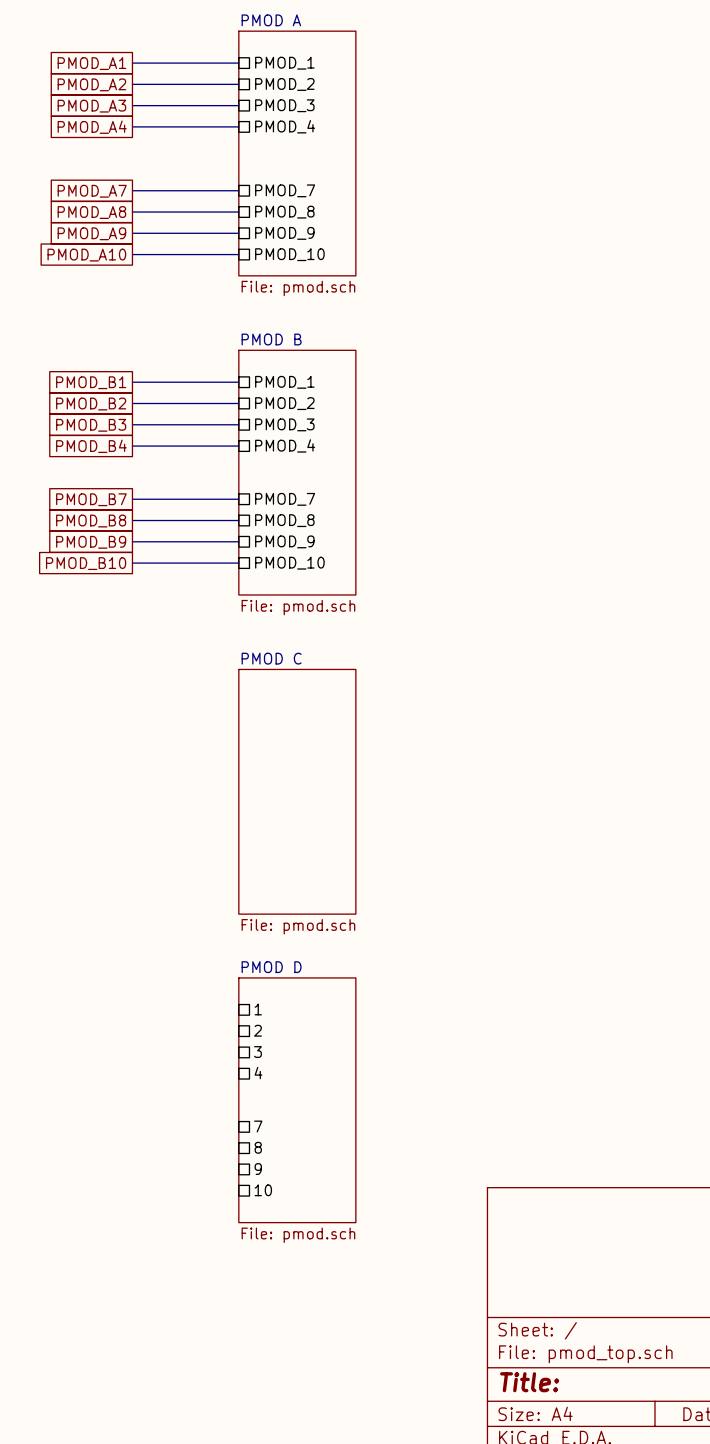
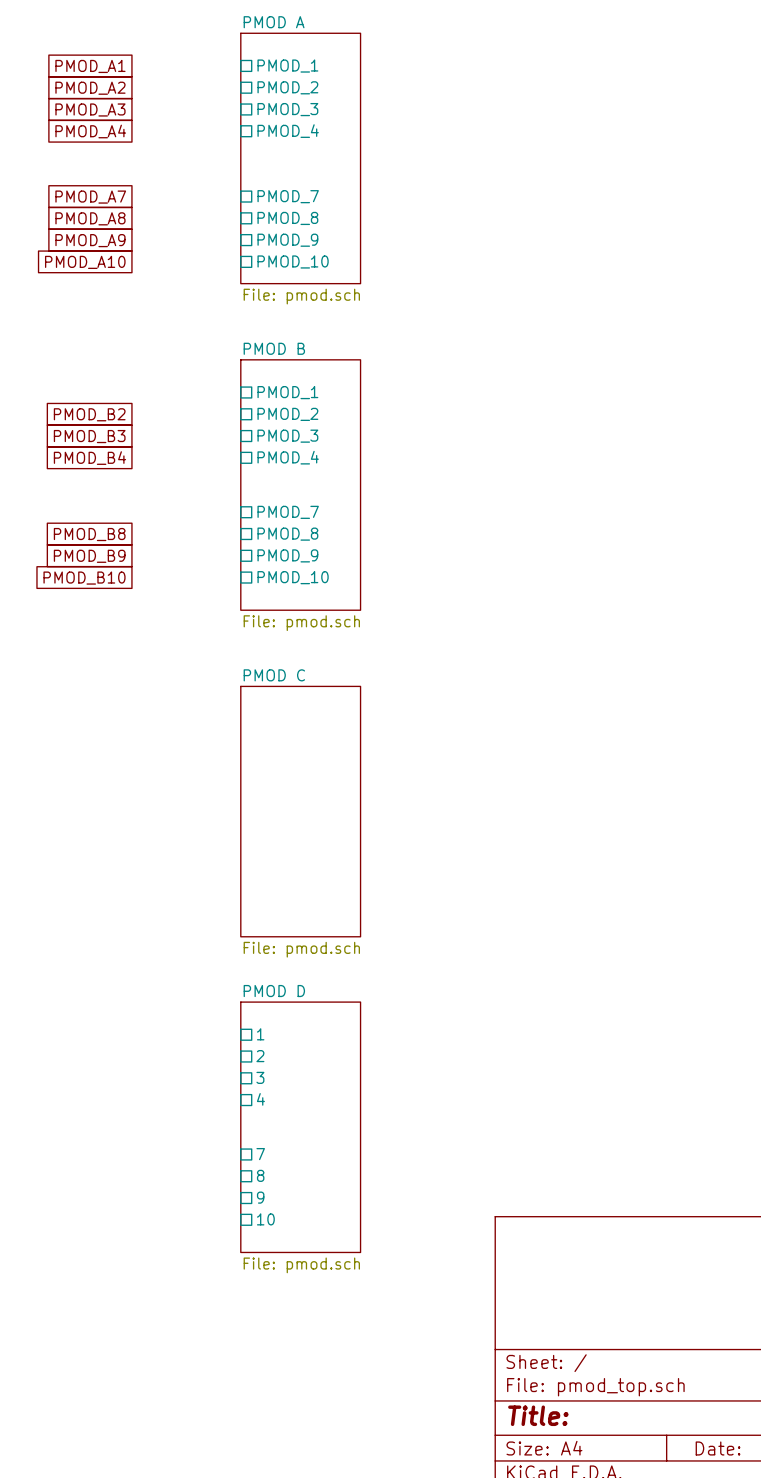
wire: (132, 63) (238, 63) -> none
wire: (132, 84) (238, 84) -> none
wire: (132, 105) (238, 105) -> none
wire: (132, 126) (238, 126) -> none
wire: (132, 190) (238, 190) -> none
wire: (132, 212) (238, 212) -> none
wire: (132, 233) (238, 233) -> none
wire: (132, 254) (238, 254) -> none
global label: PMOD_B1 (91, 382) -> none
wire: (132, 382) (238, 382) -> none
wire: (132, 403) (238, 403) -> none
wire: (132, 424) (238, 424) -> none
wire: (132, 446) (238, 446) -> none
global label: PMOD_B7 (91, 499) -> none
wire: (132, 499) (238, 499) -> none
wire: (132, 520) (238, 520) -> none
wire: (132, 541) (238, 541) -> none
wire: (132, 563) (238, 563) -> none

